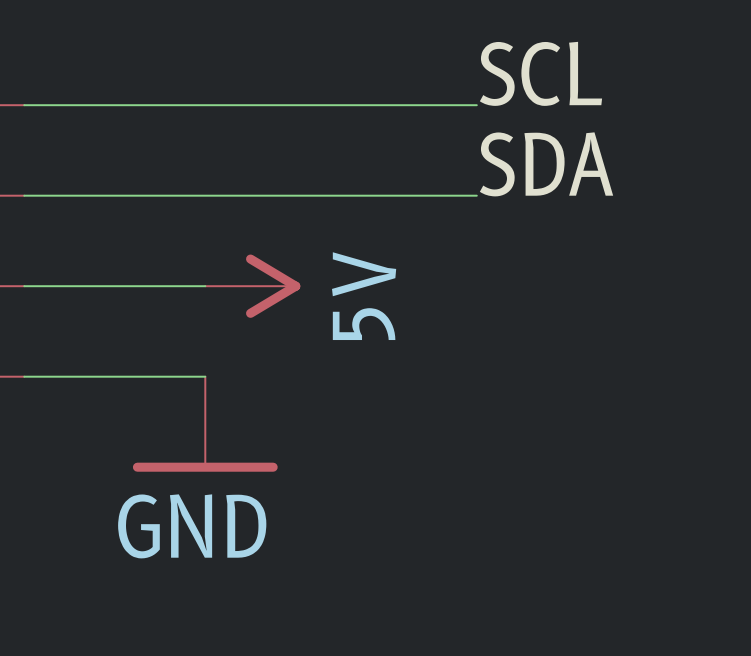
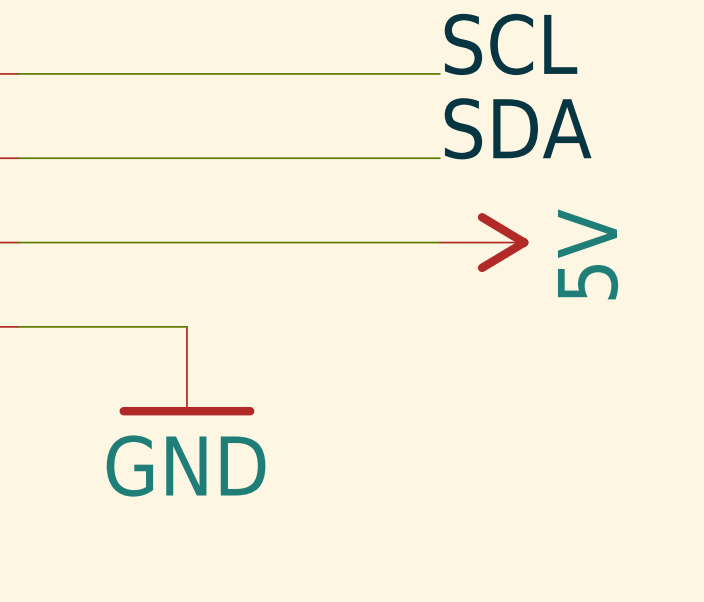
wire: none -> (186, 242) (439, 242)
power symbol position: 5V (252, 286) -> 5V (484, 242)

